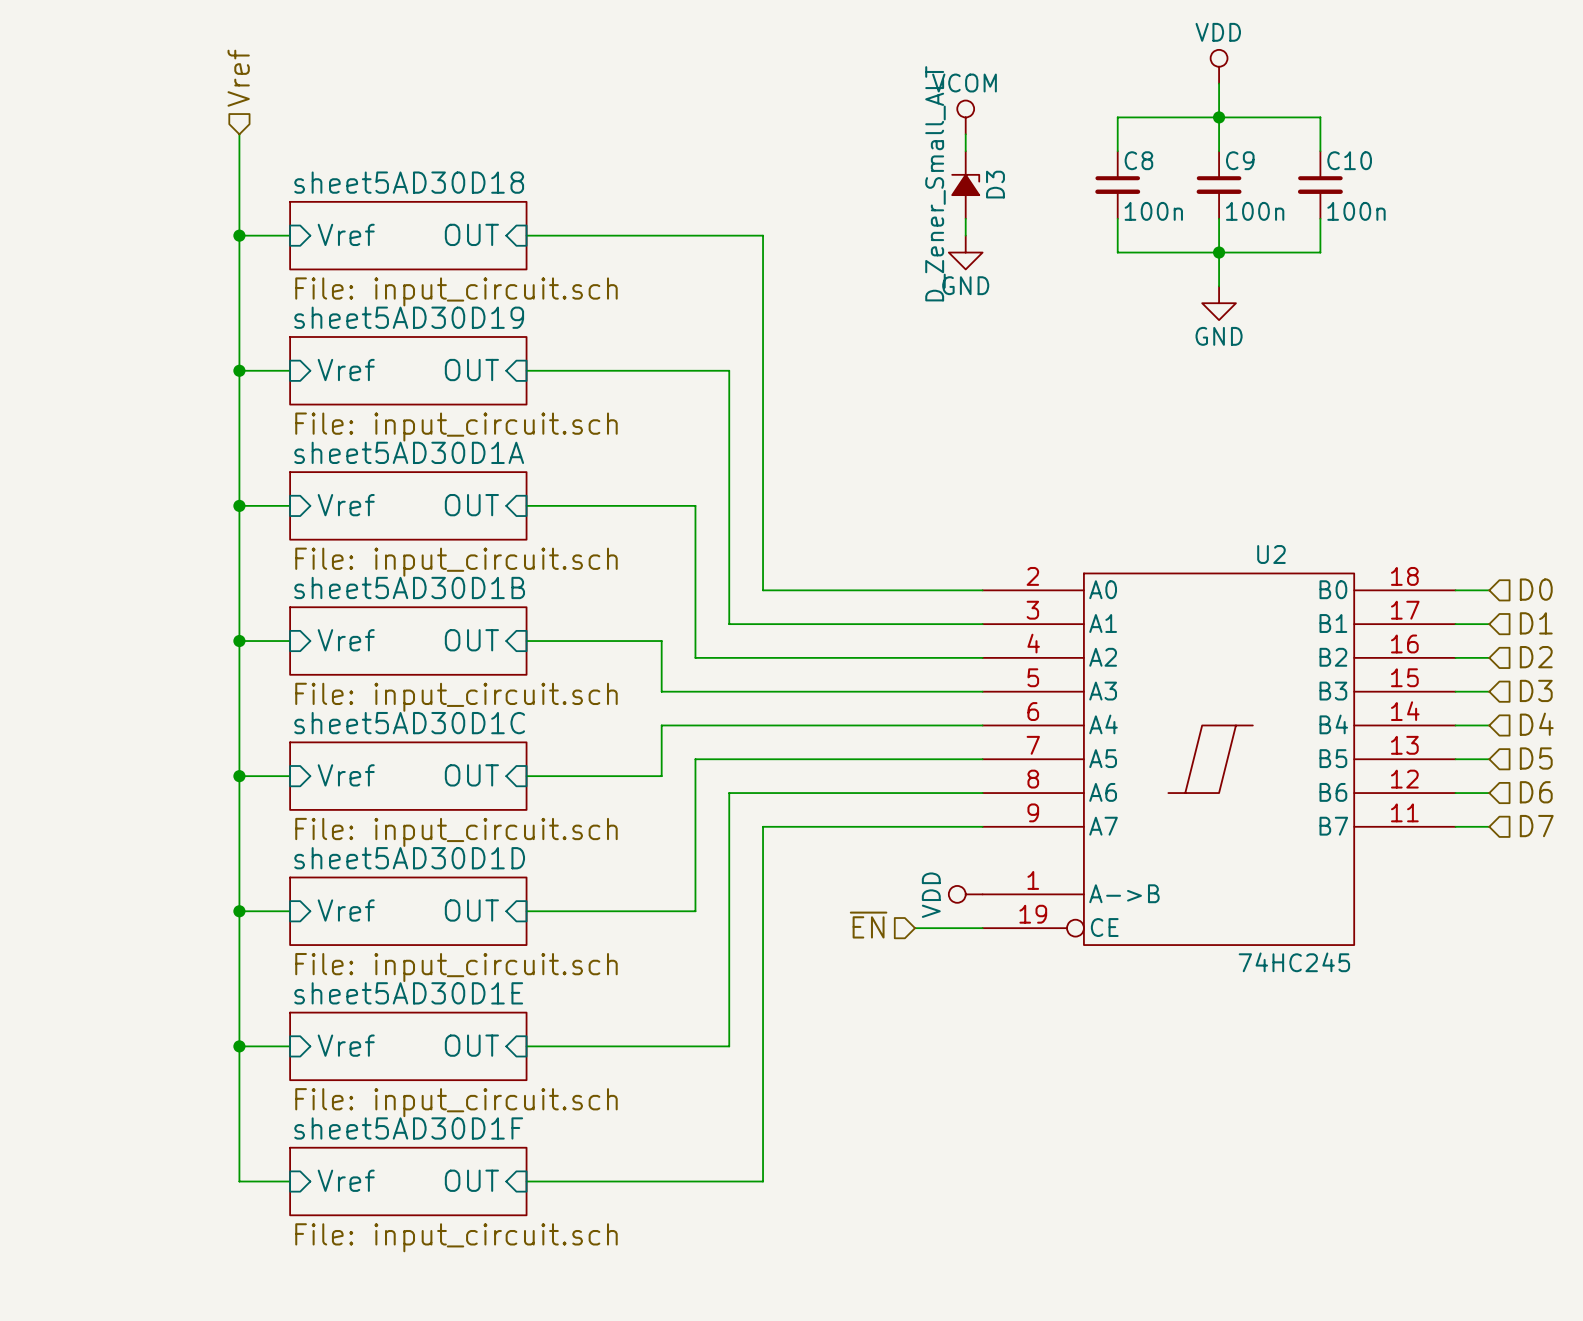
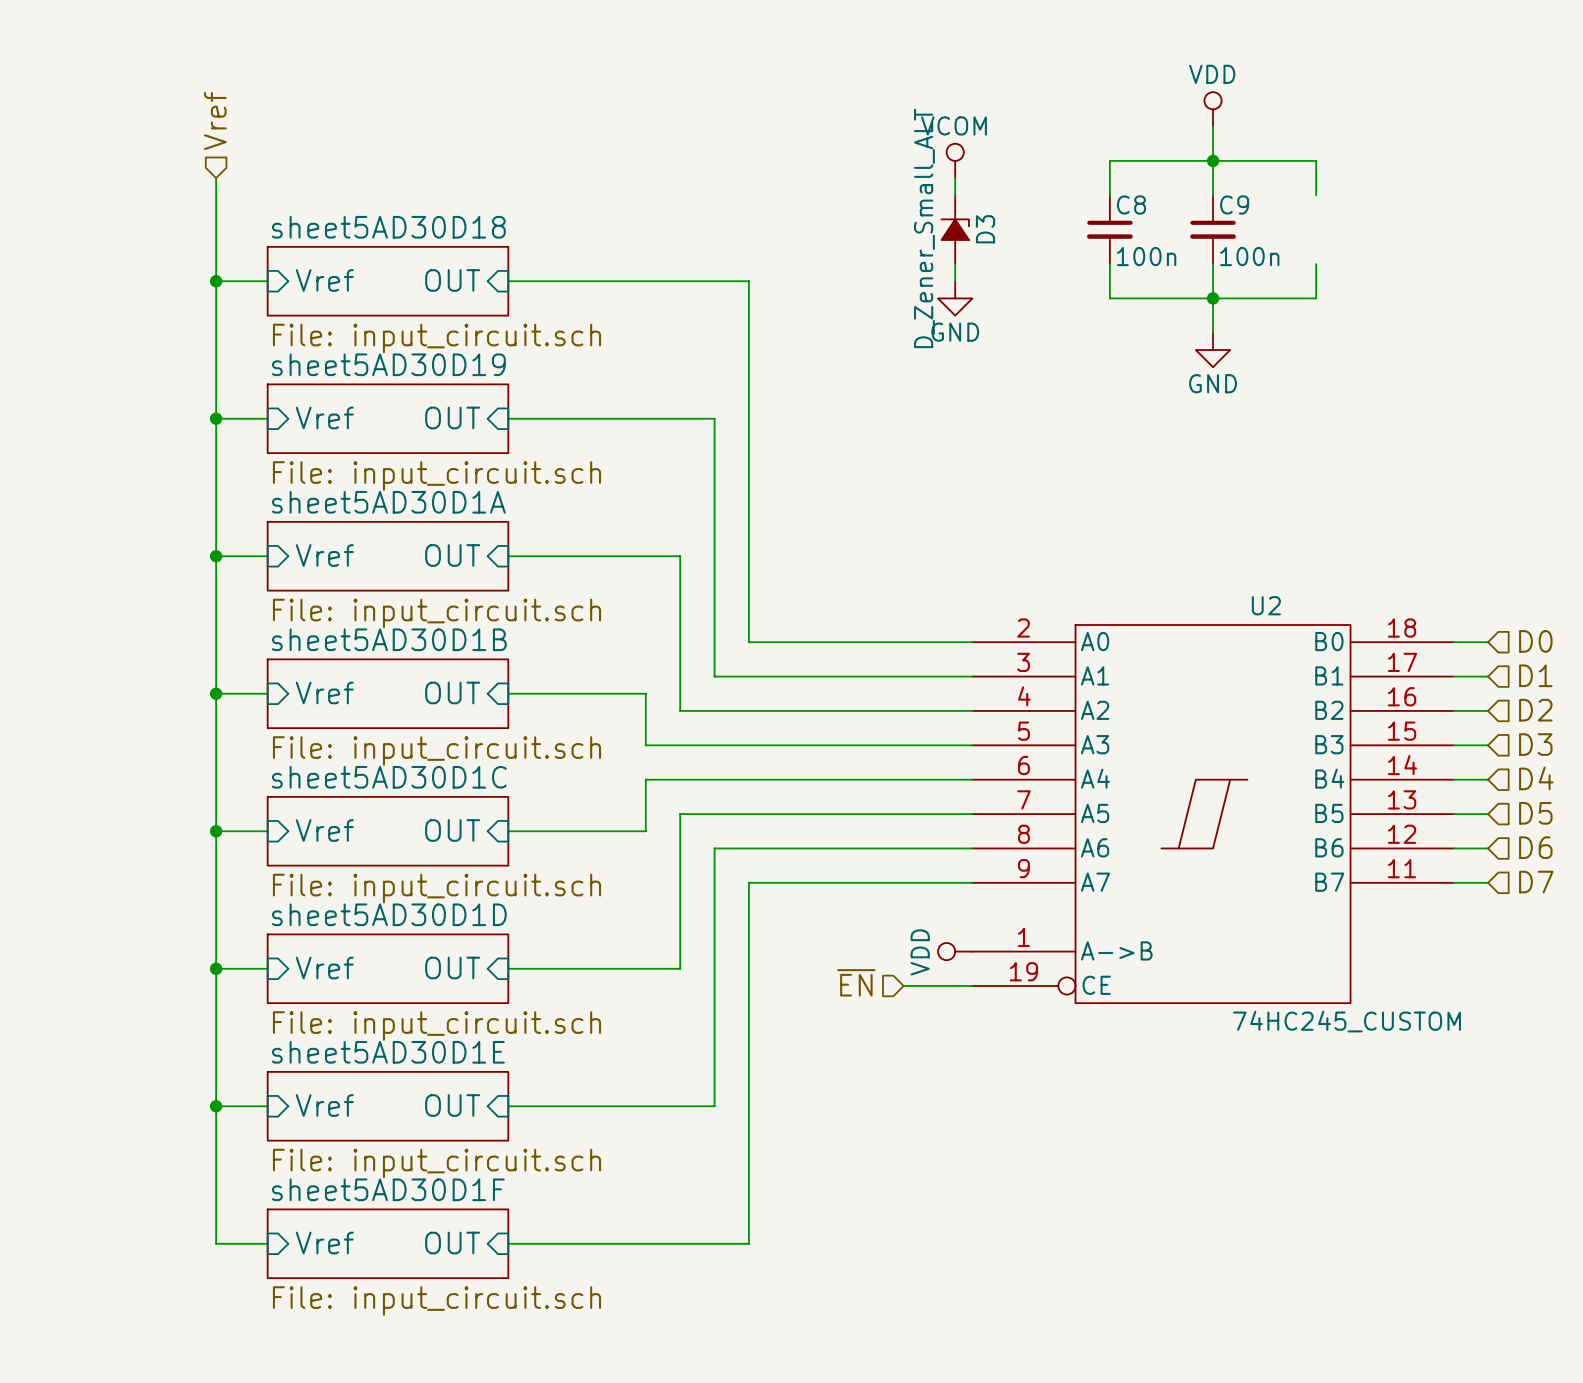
C10: 100n (1320, 184) -> none
U2 value: 74HC245 (1294, 962) -> 74HC245_CUSTOM (1346, 1021)

